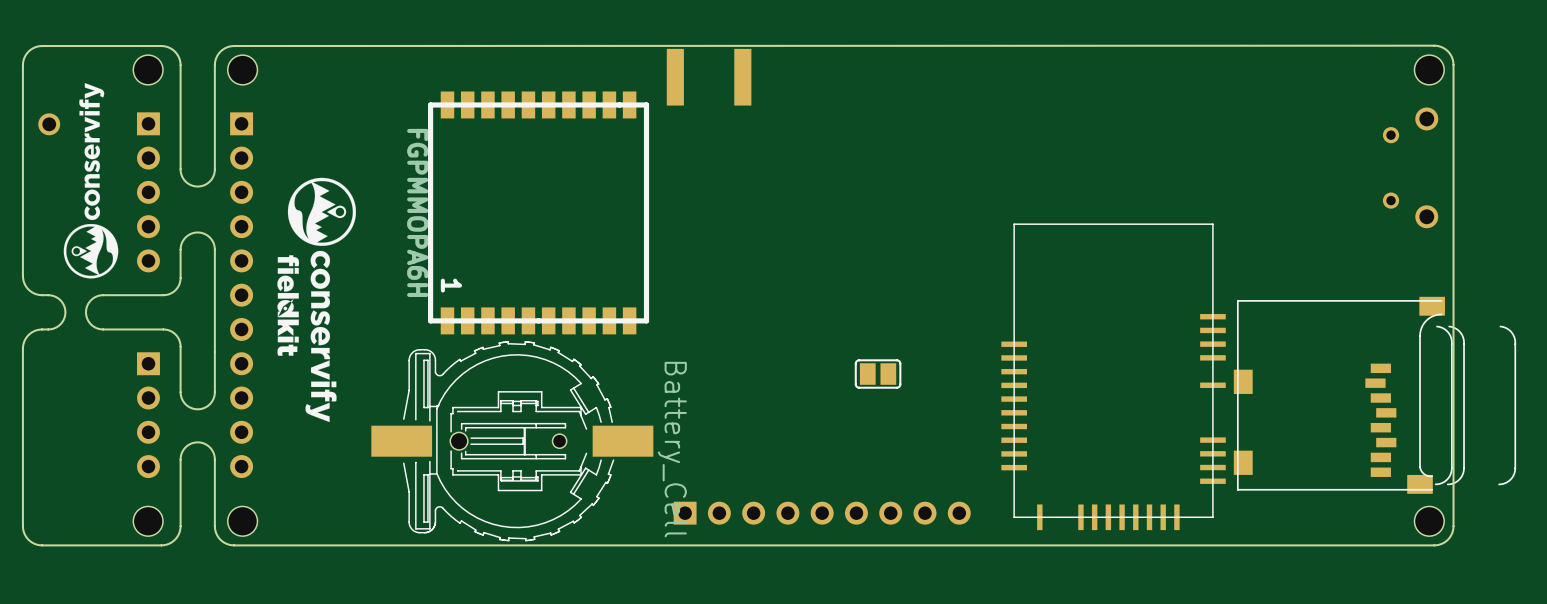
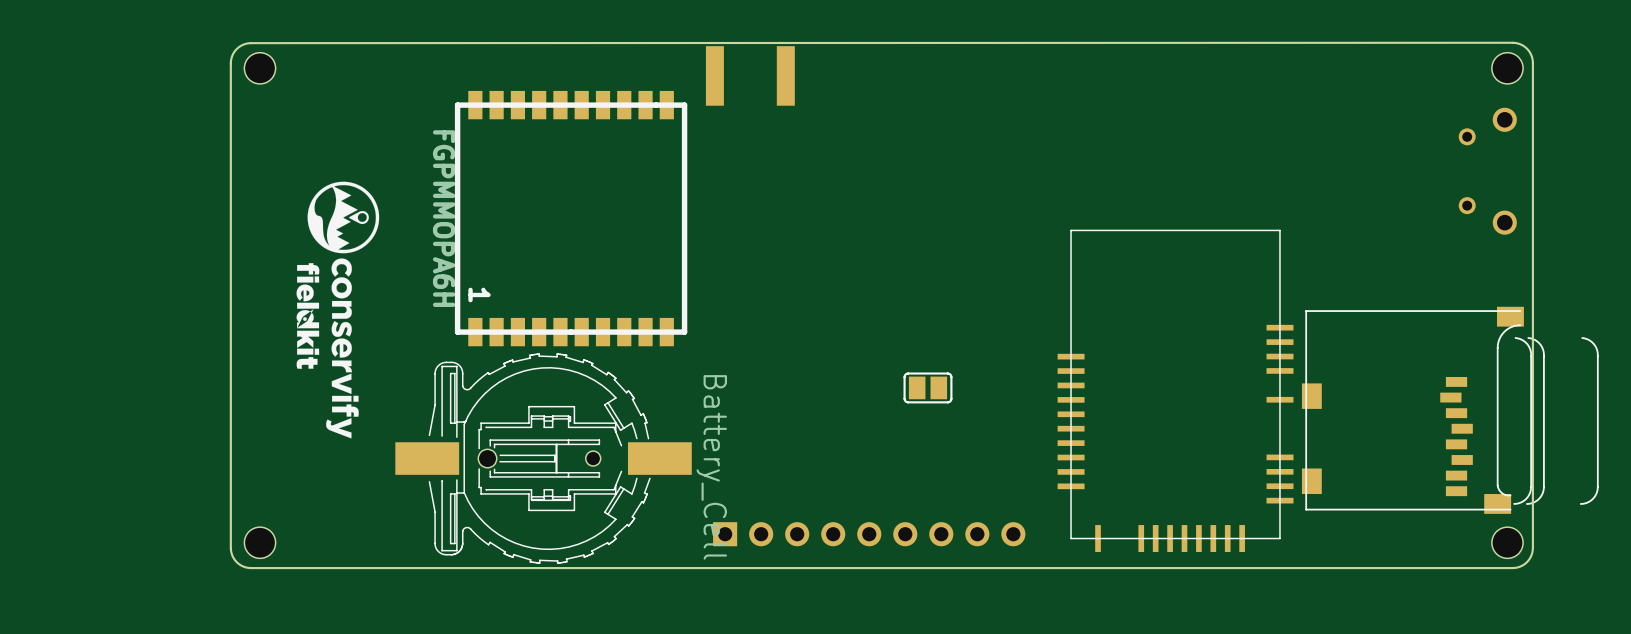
part: (148, 69) -> none
drawing: [63, 83, 119, 279] -> none
part: (49, 124) -> none
board edge: (214, 169) (211, 179) (201, 186) (189, 184) (181, 175) (180, 62) (176, 53) (170, 48) (161, 46) (42, 46) (32, 48) (25, 55) (22, 65) (23, 278) (26, 287) (32, 292) (52, 295) (58, 298) (64, 305) (65, 312) (63, 320) (58, 325) (52, 328) (32, 332) (25, 339) (23, 346) (24, 533) (30, 541) (39, 545) (168, 543) (176, 537) (180, 528) (180, 459) (182, 451) (191, 443) (201, 442) (211, 449) (214, 459) -> (230, 172) (230, 257)
part: (148, 192) -> none
board edge: (214, 249) (212, 241) (206, 234) (199, 232) (191, 233) (185, 237) (181, 245) (180, 280) (173, 291) (163, 295) (98, 295) (89, 301) (85, 312) (89, 322) (98, 328) (163, 329) (172, 331) (177, 336) (180, 344) (180, 392) (184, 402) (193, 408) (204, 408) (212, 400) (214, 392) -> (230, 478) (230, 407)
part: (241, 295) -> none
part: (148, 415) -> none
part: (148, 521) -> none

